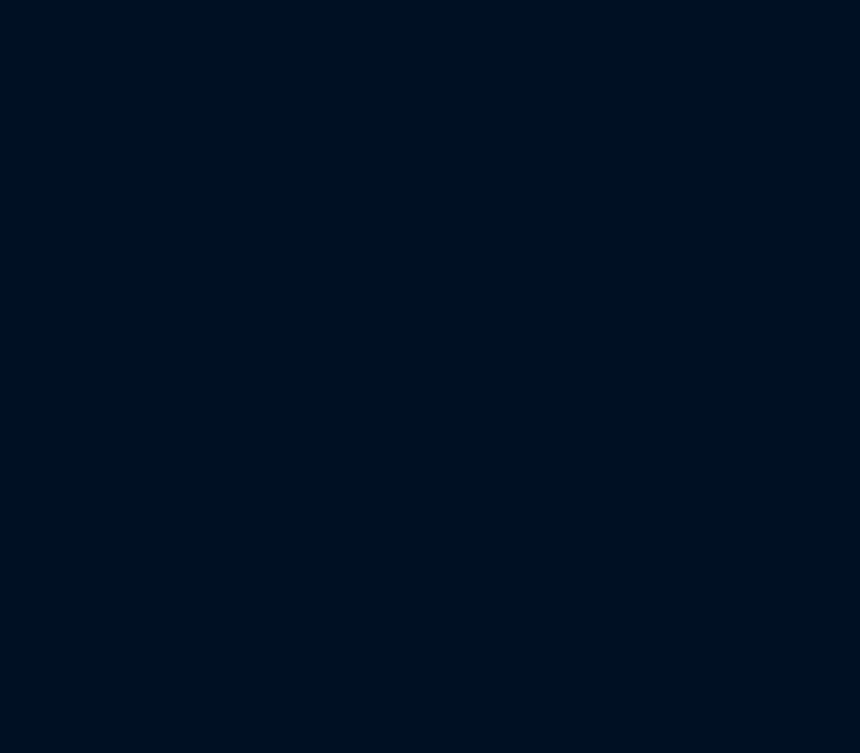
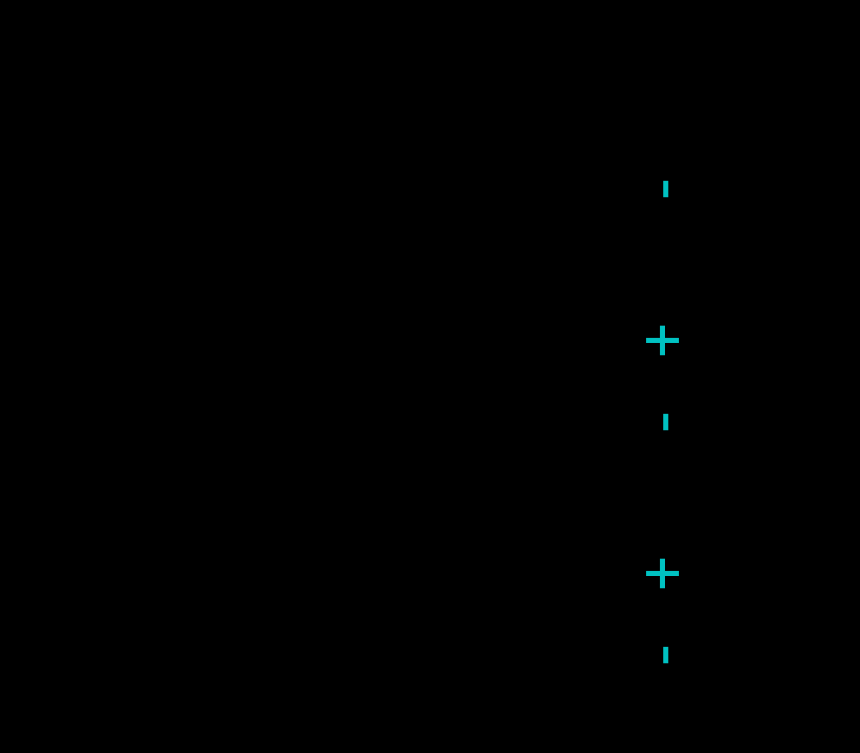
text: none -> - (665, 189)
text: none -> + (662, 340)
text: none -> - (665, 422)
text: none -> + (662, 573)
text: none -> - (665, 655)

